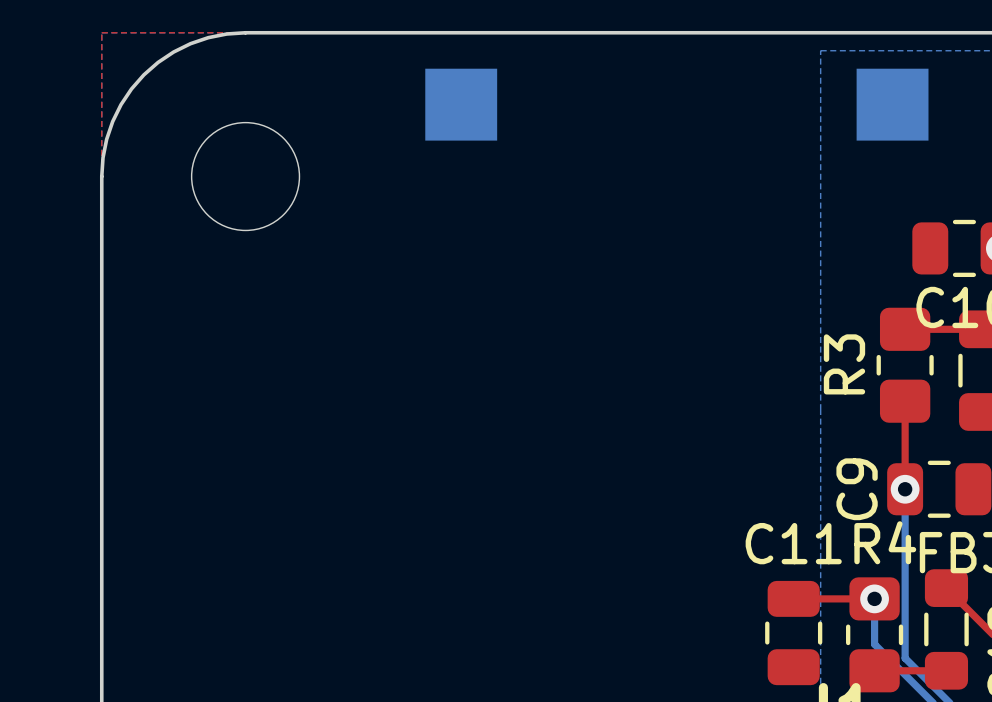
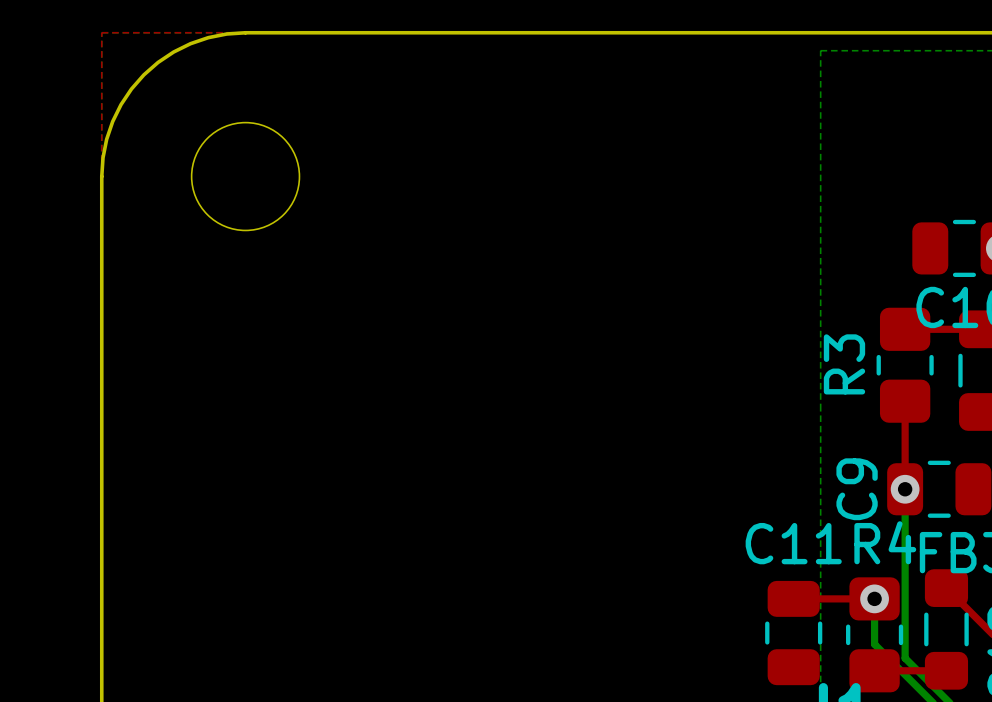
part: (461, 104) -> none
part: (892, 104) -> none

